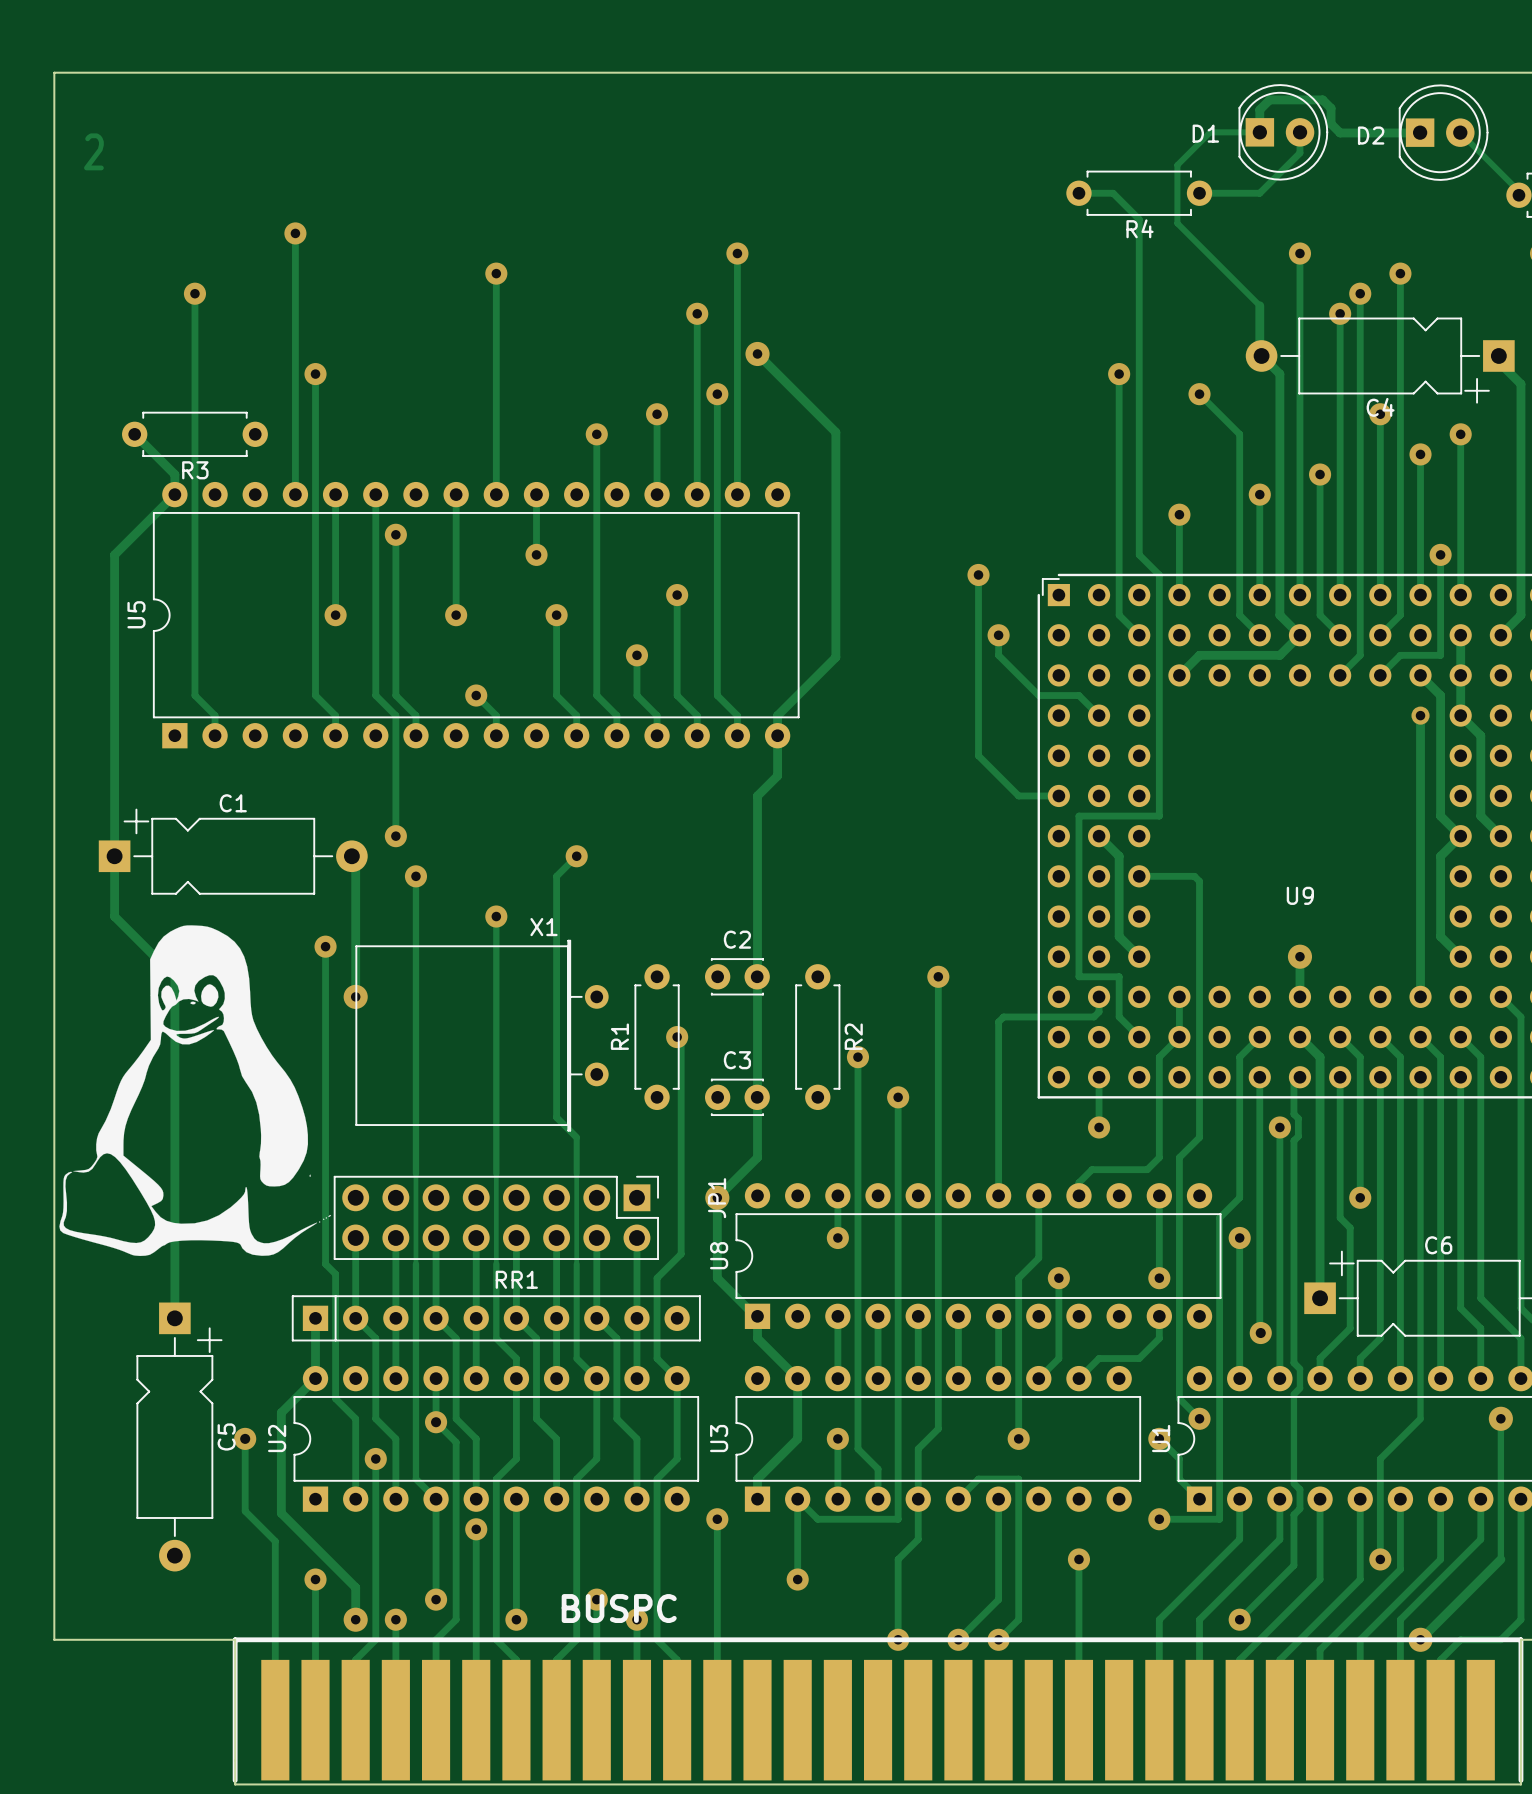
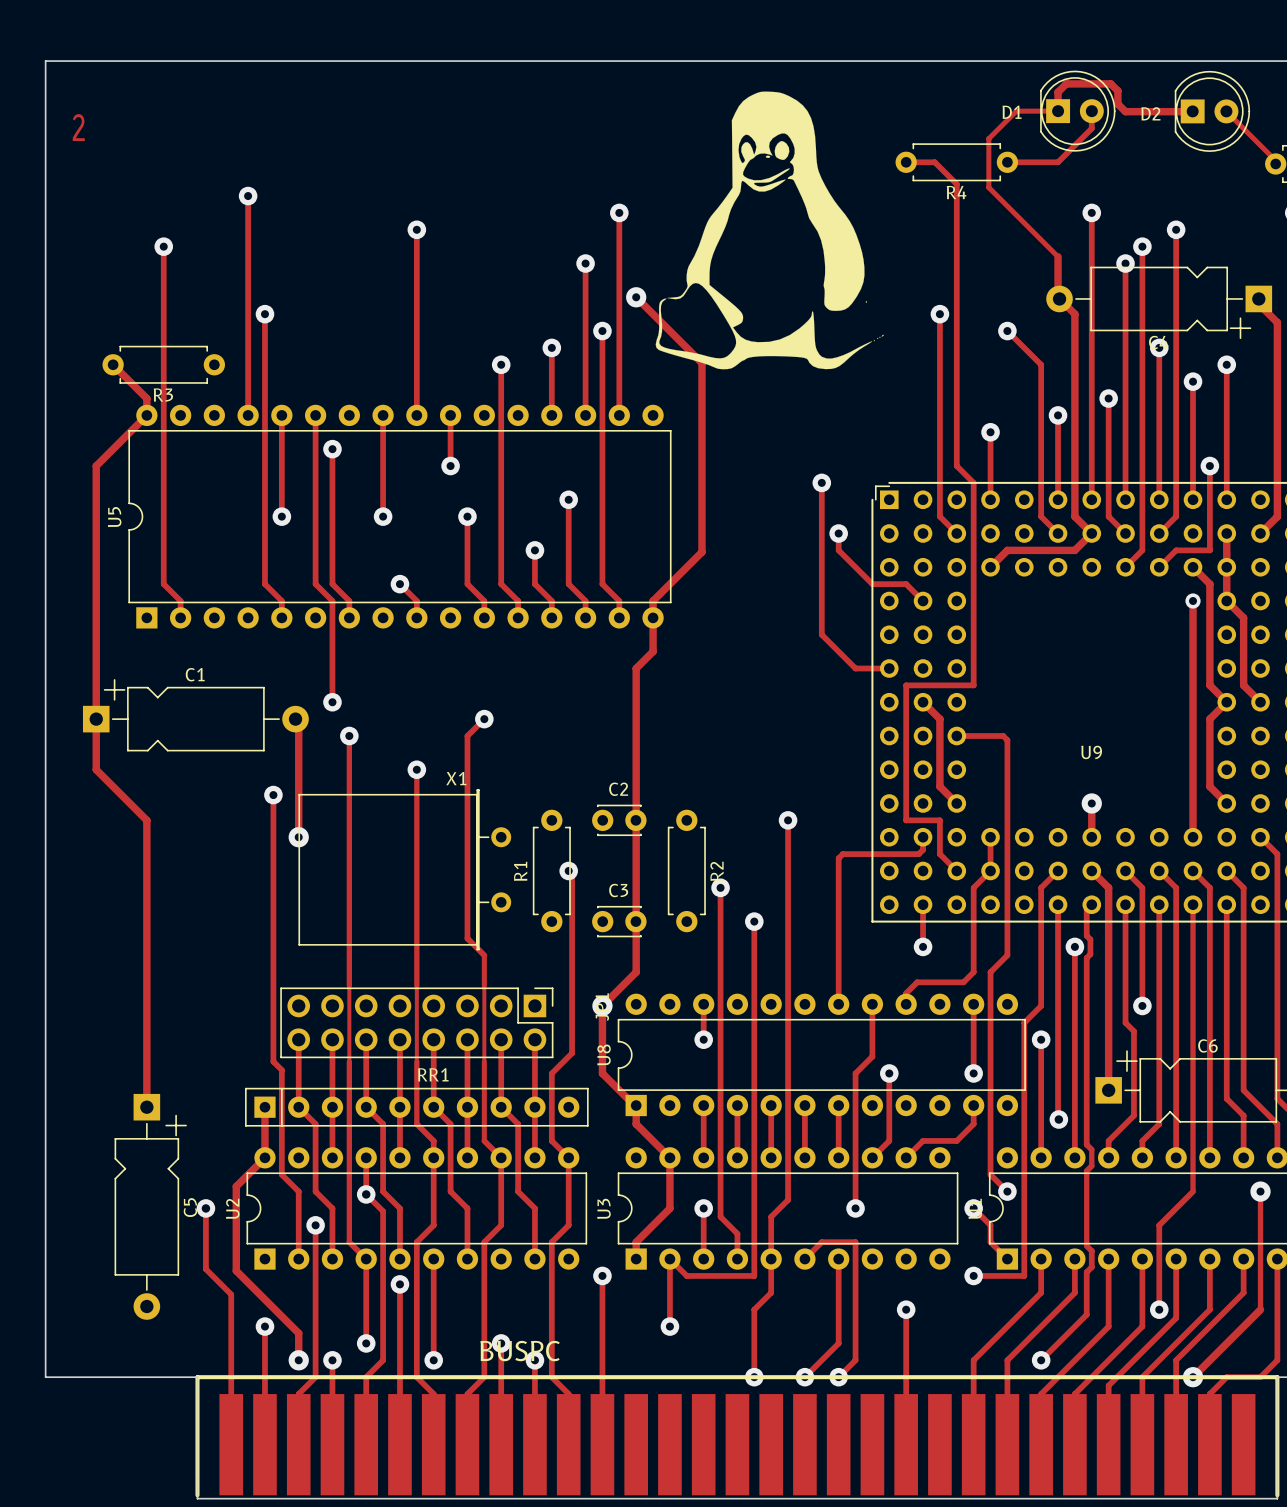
drawing: none -> [655, 91, 884, 370]
drawing: [59, 925, 332, 1257] -> none

